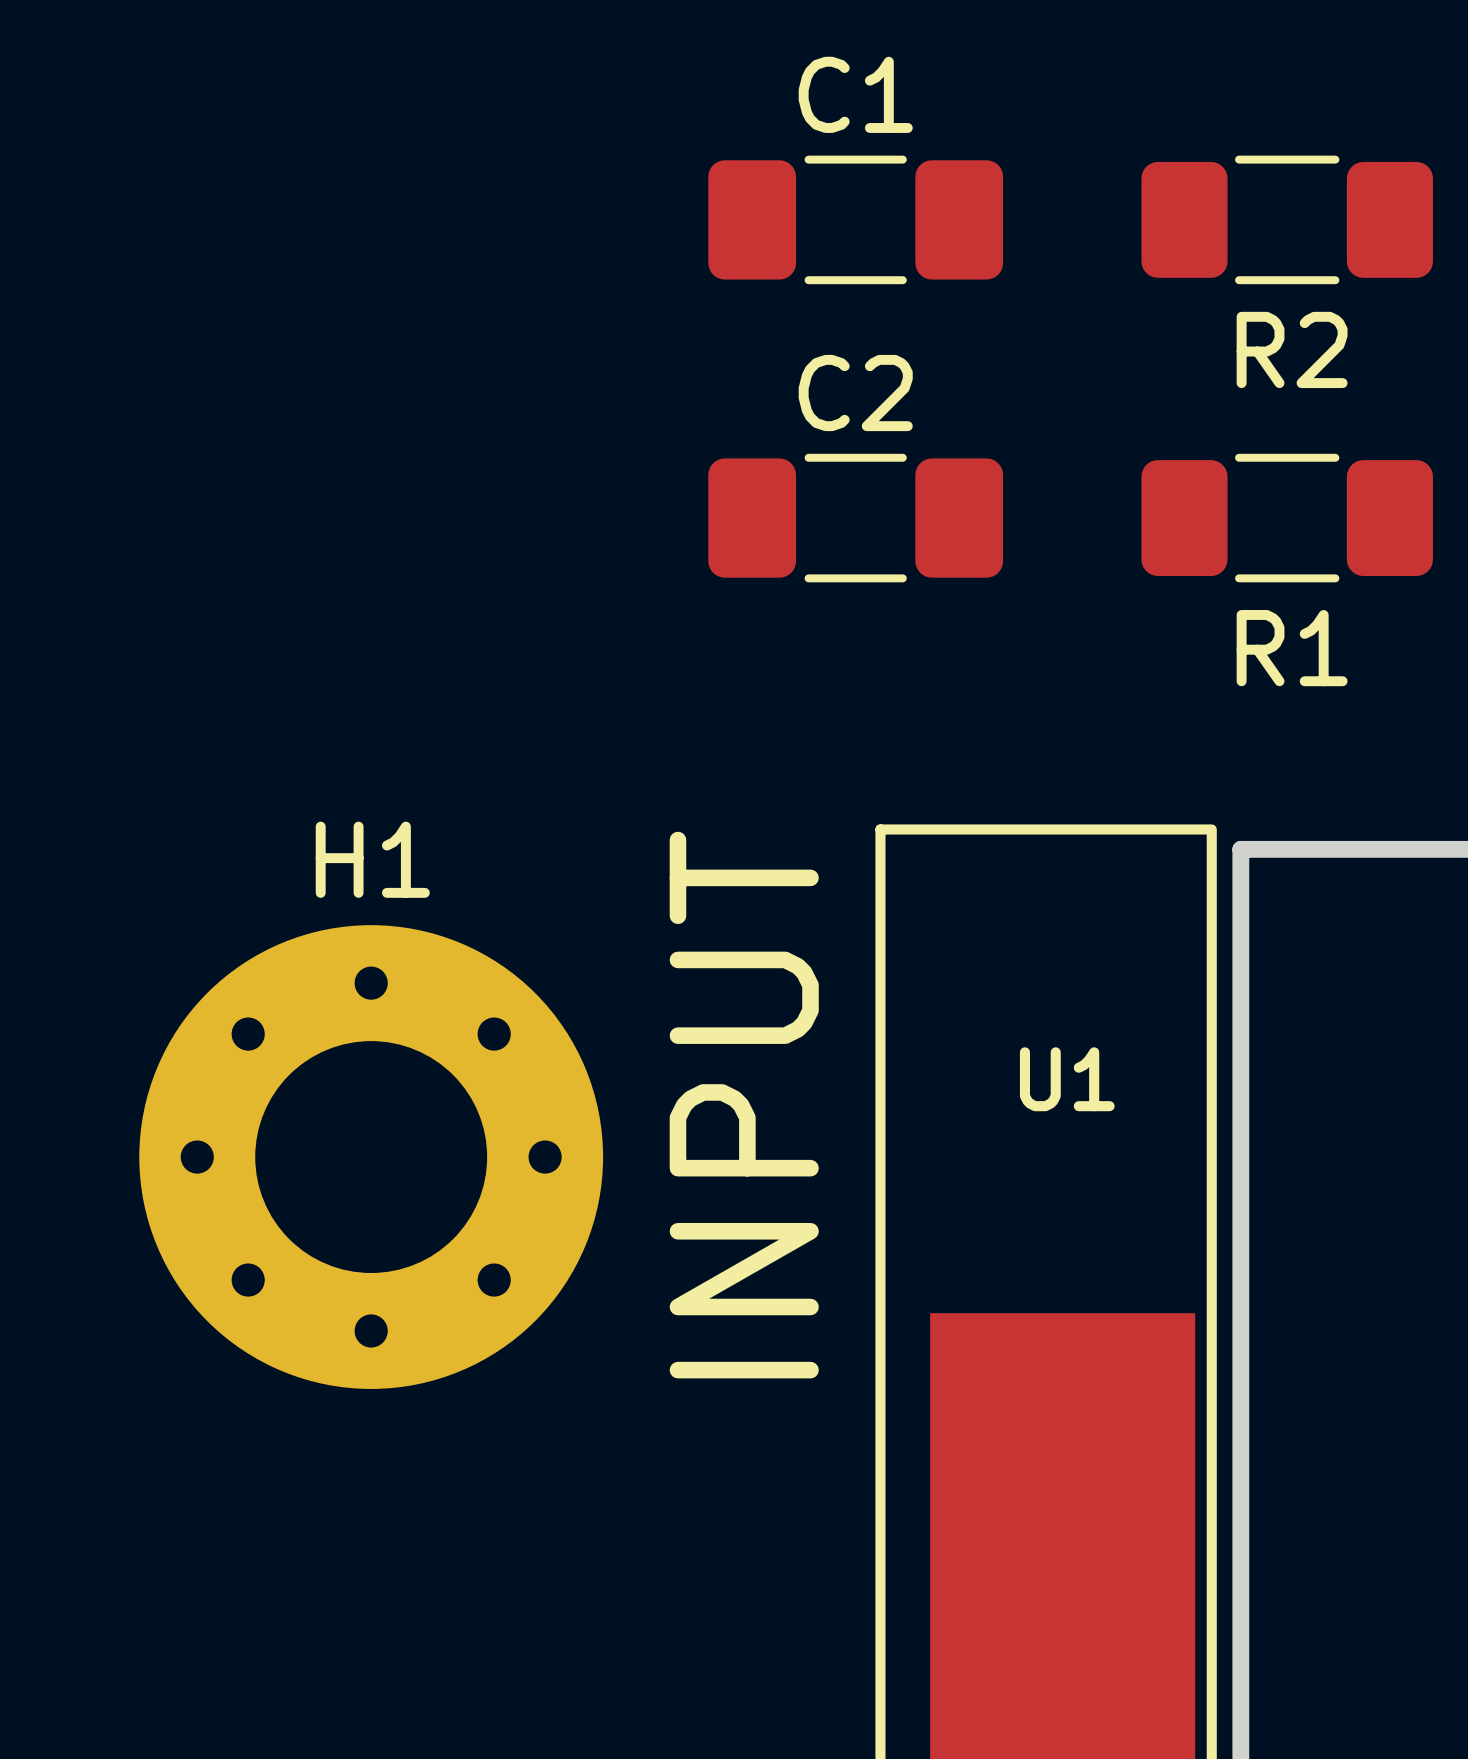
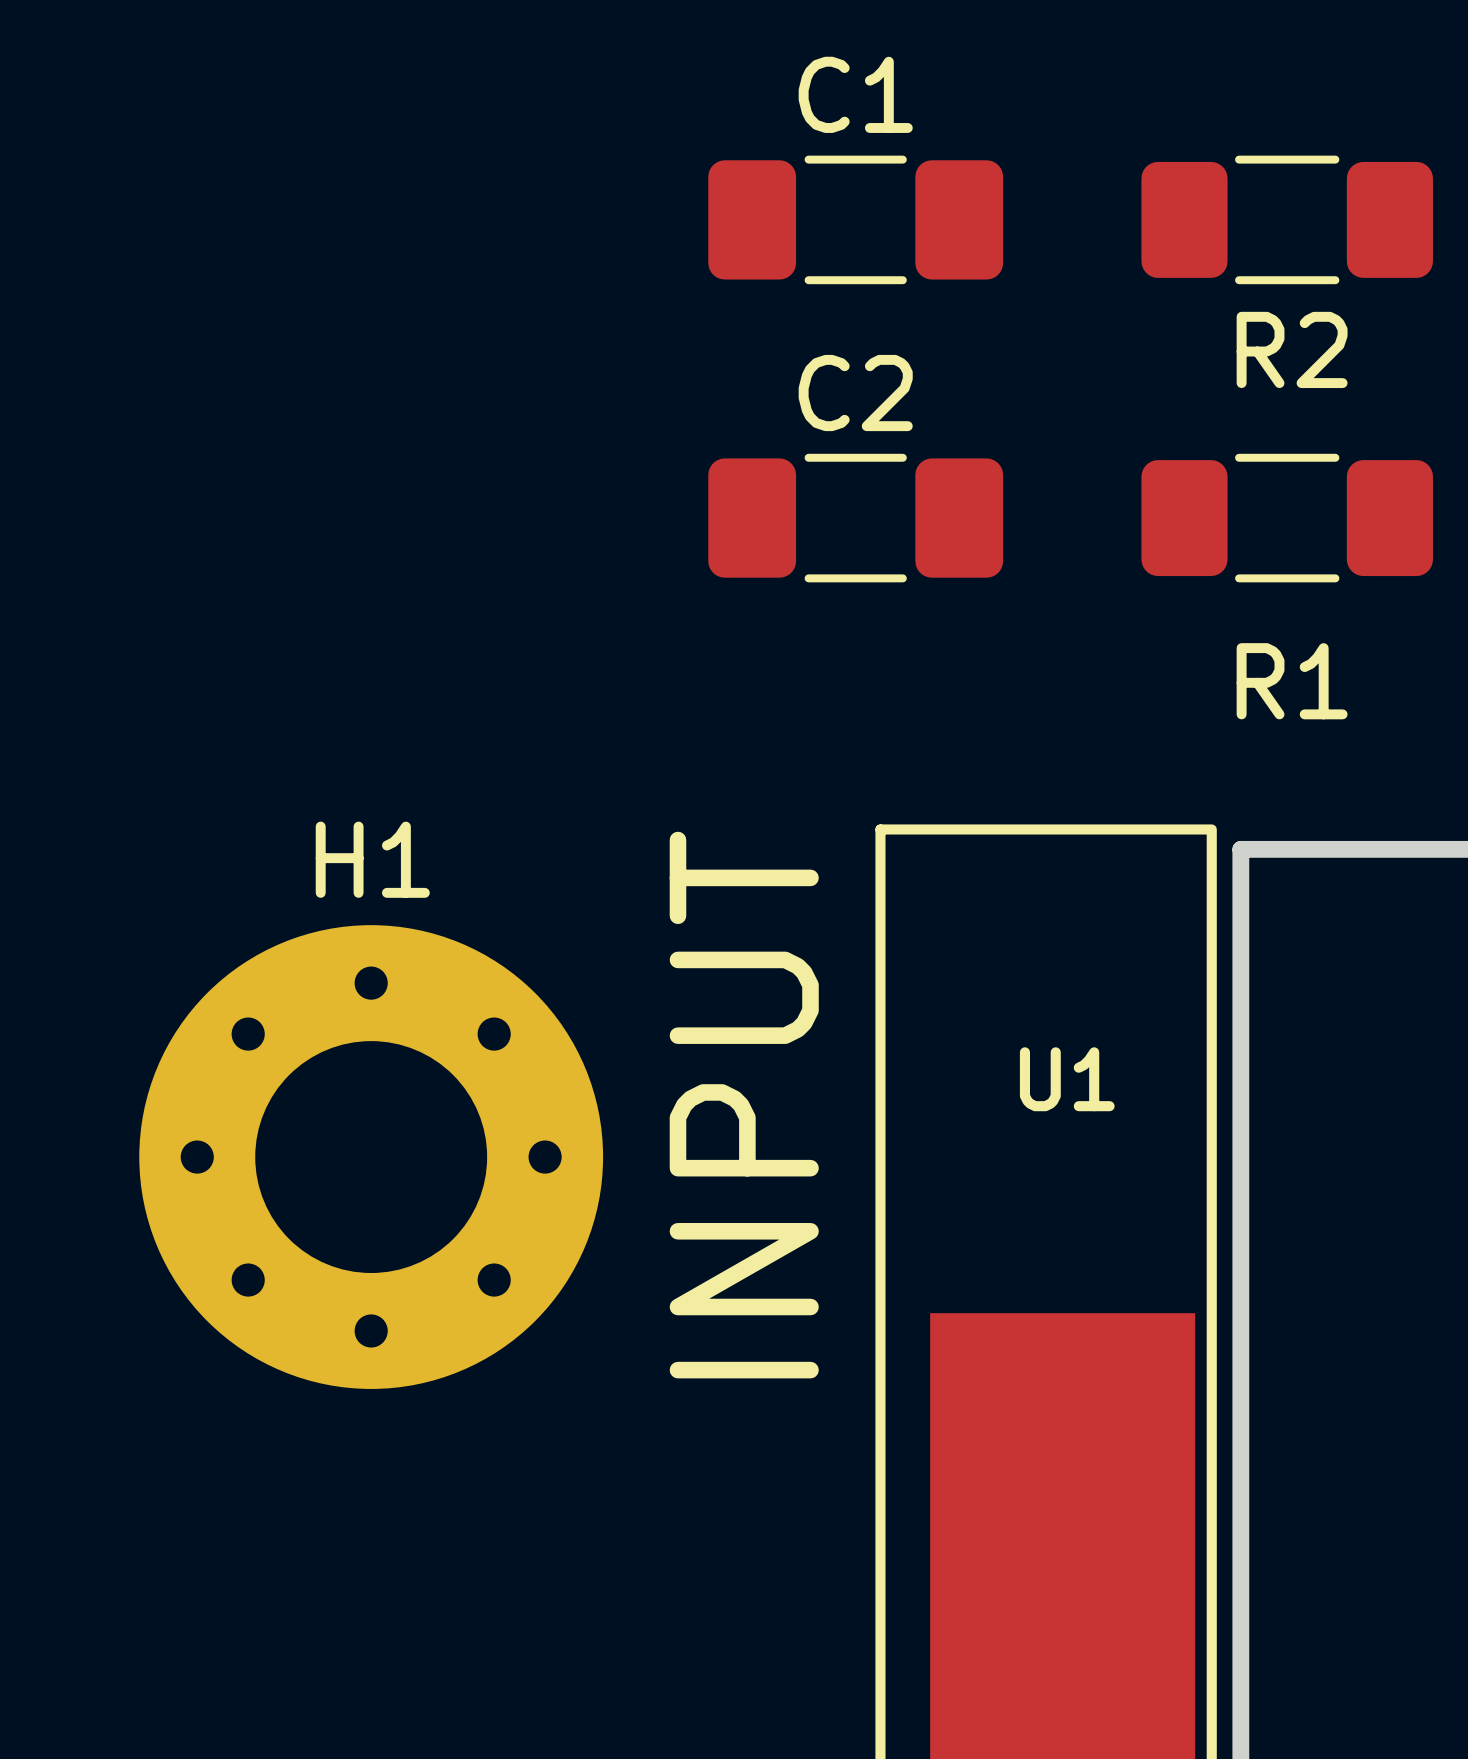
R1 name position: R1 (1292, 648) -> R1 (1292, 681)

